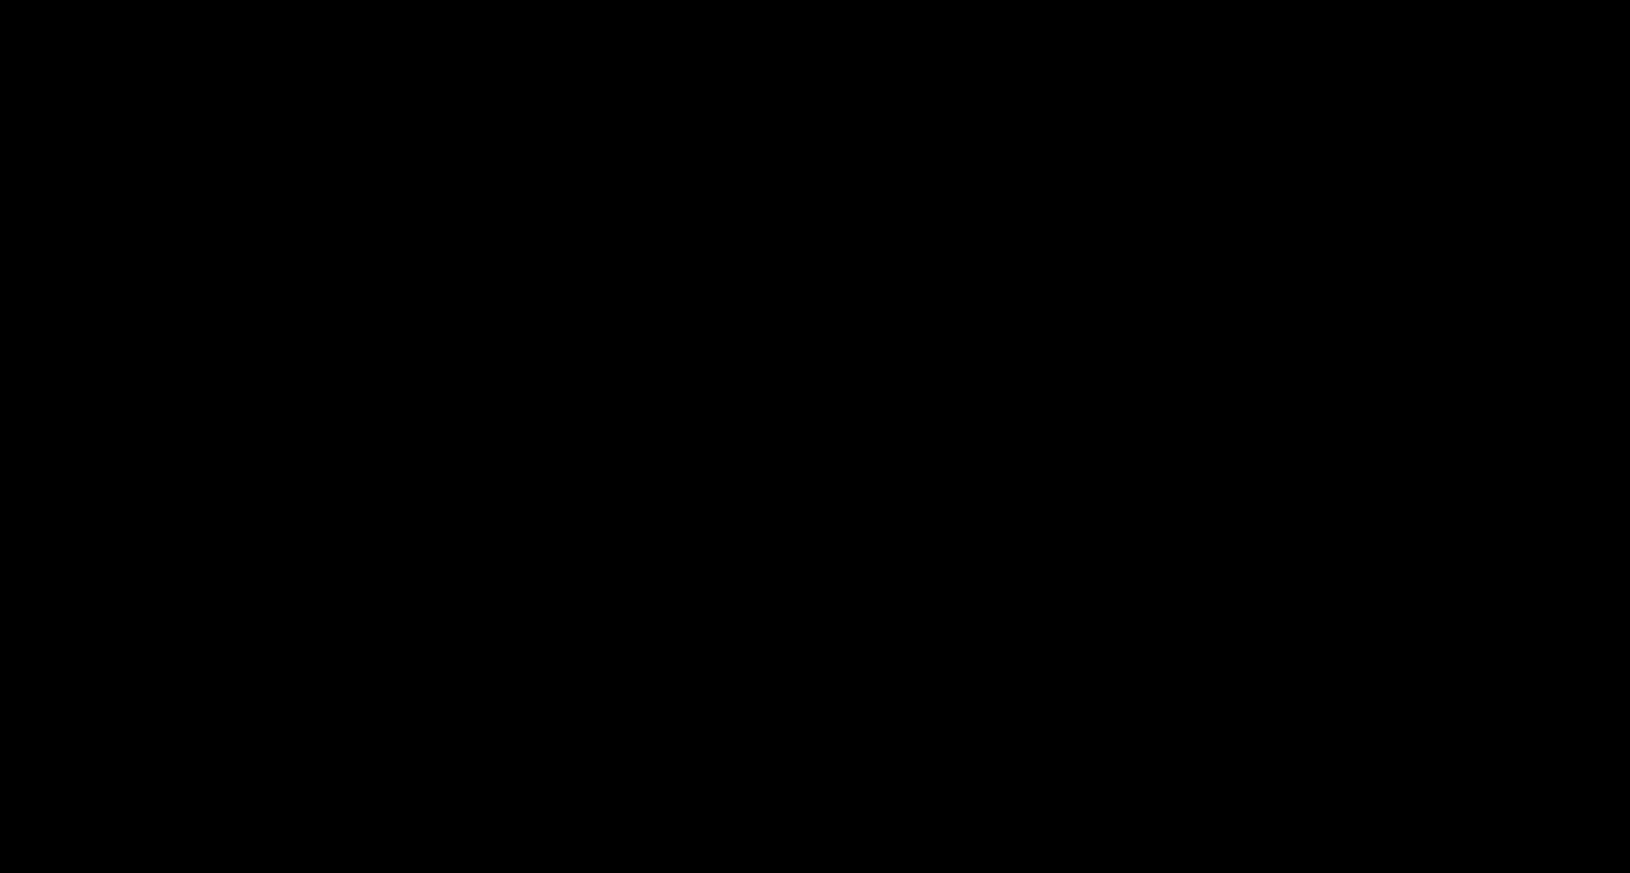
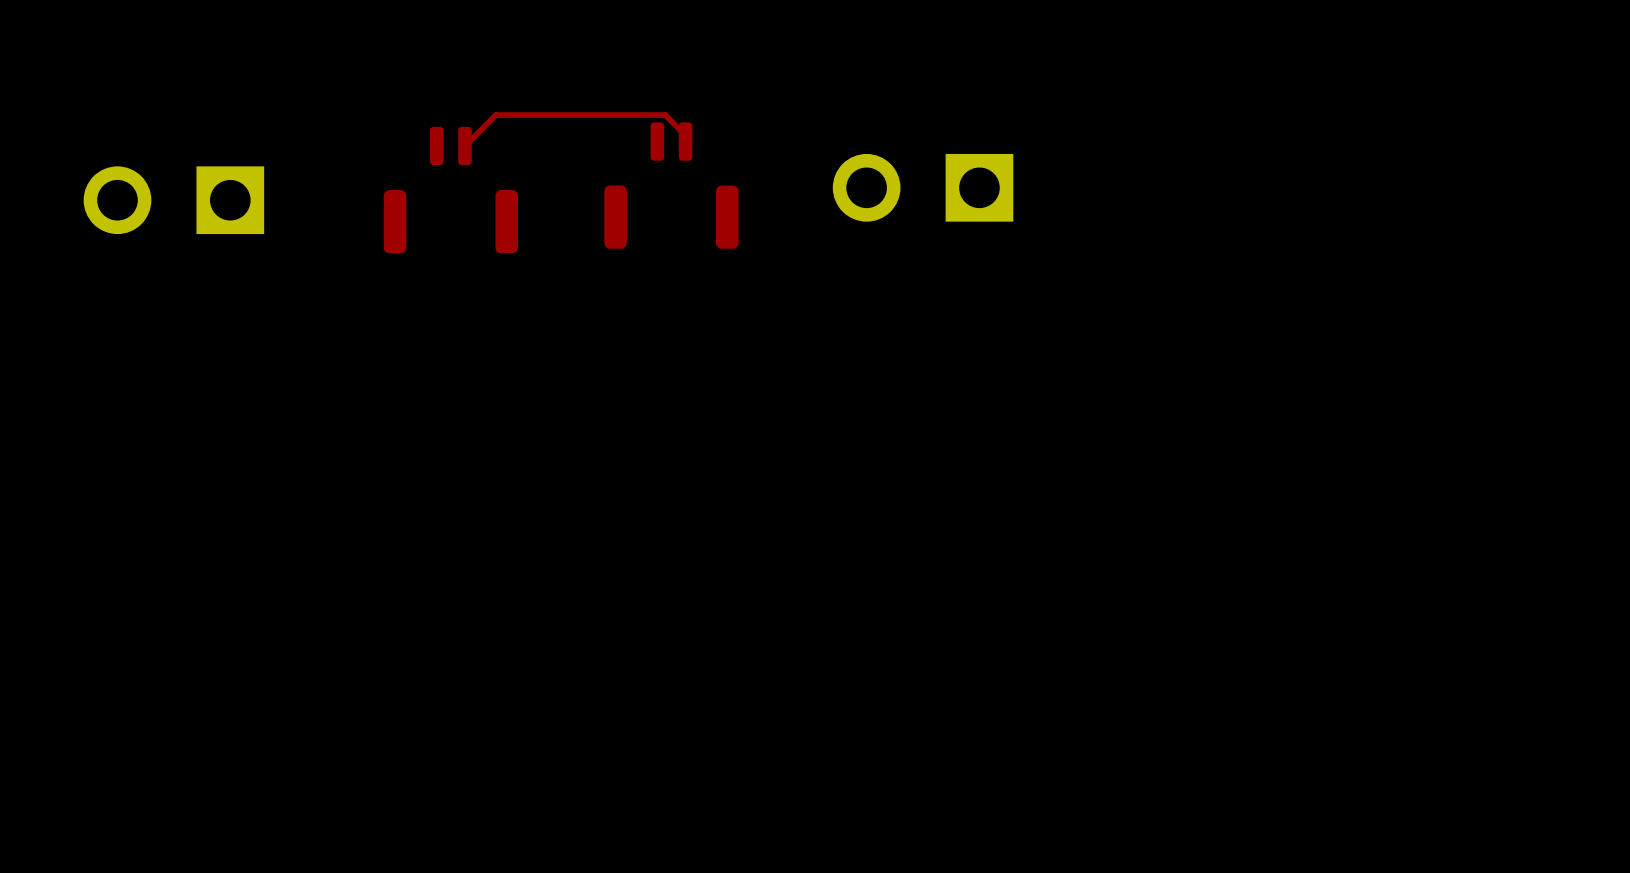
top track: none -> (685, 135) (665, 115) (496, 115) (464, 146)
part: none -> (671, 185)
part: none -> (923, 187)
part: none -> (450, 190)
part: none -> (173, 200)

